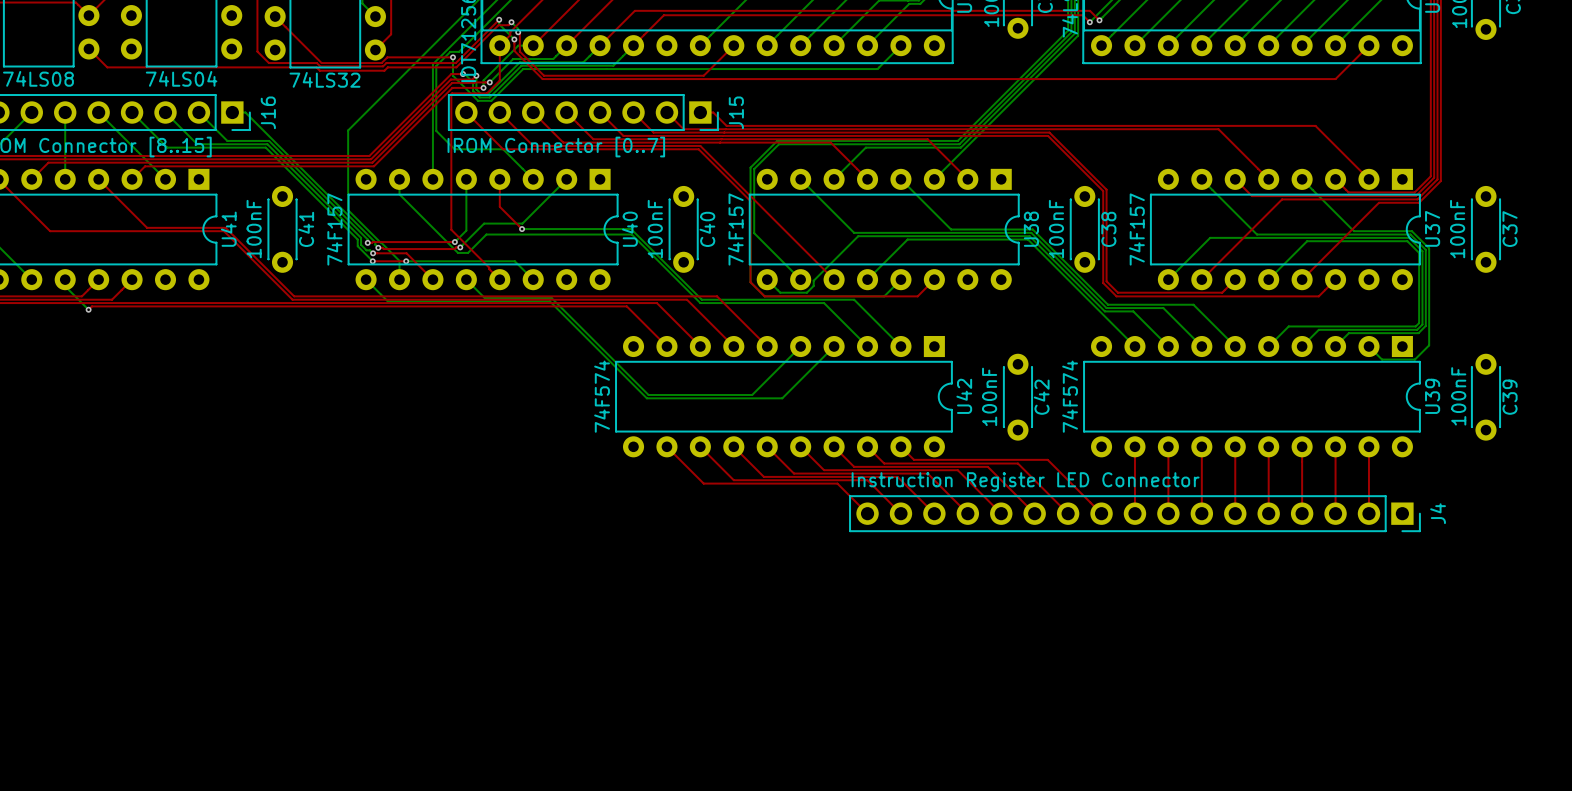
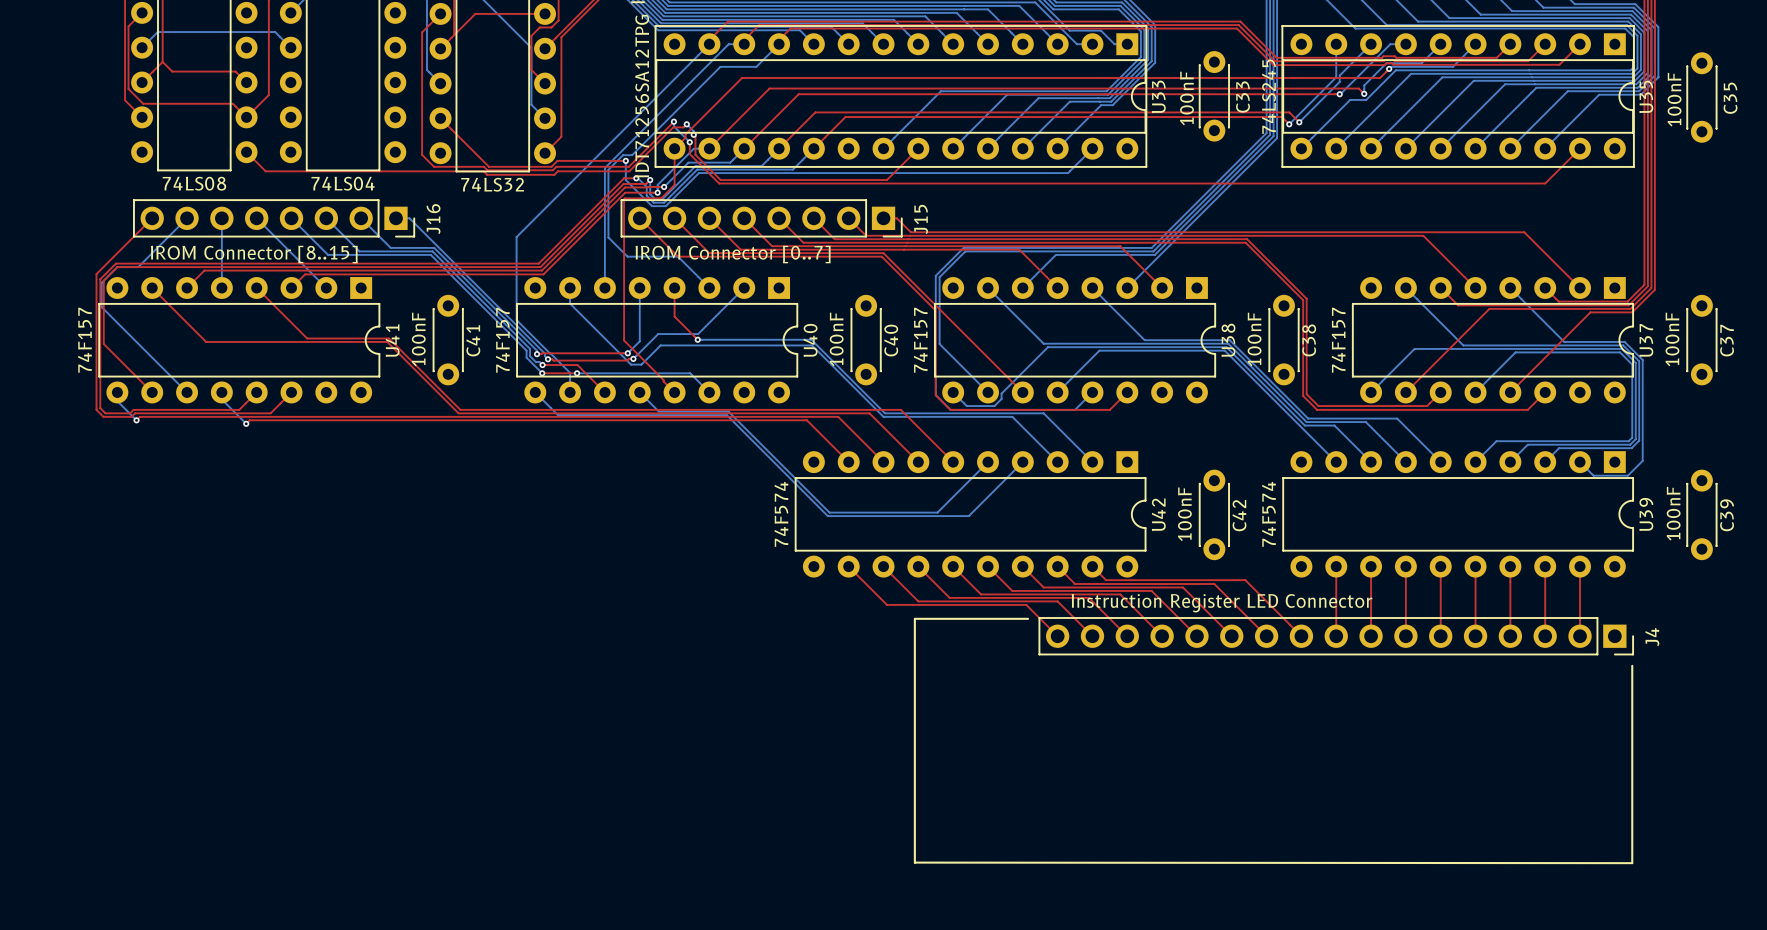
line: none -> (1028, 618) (914, 618) (914, 862) (1632, 863) (1632, 665)

